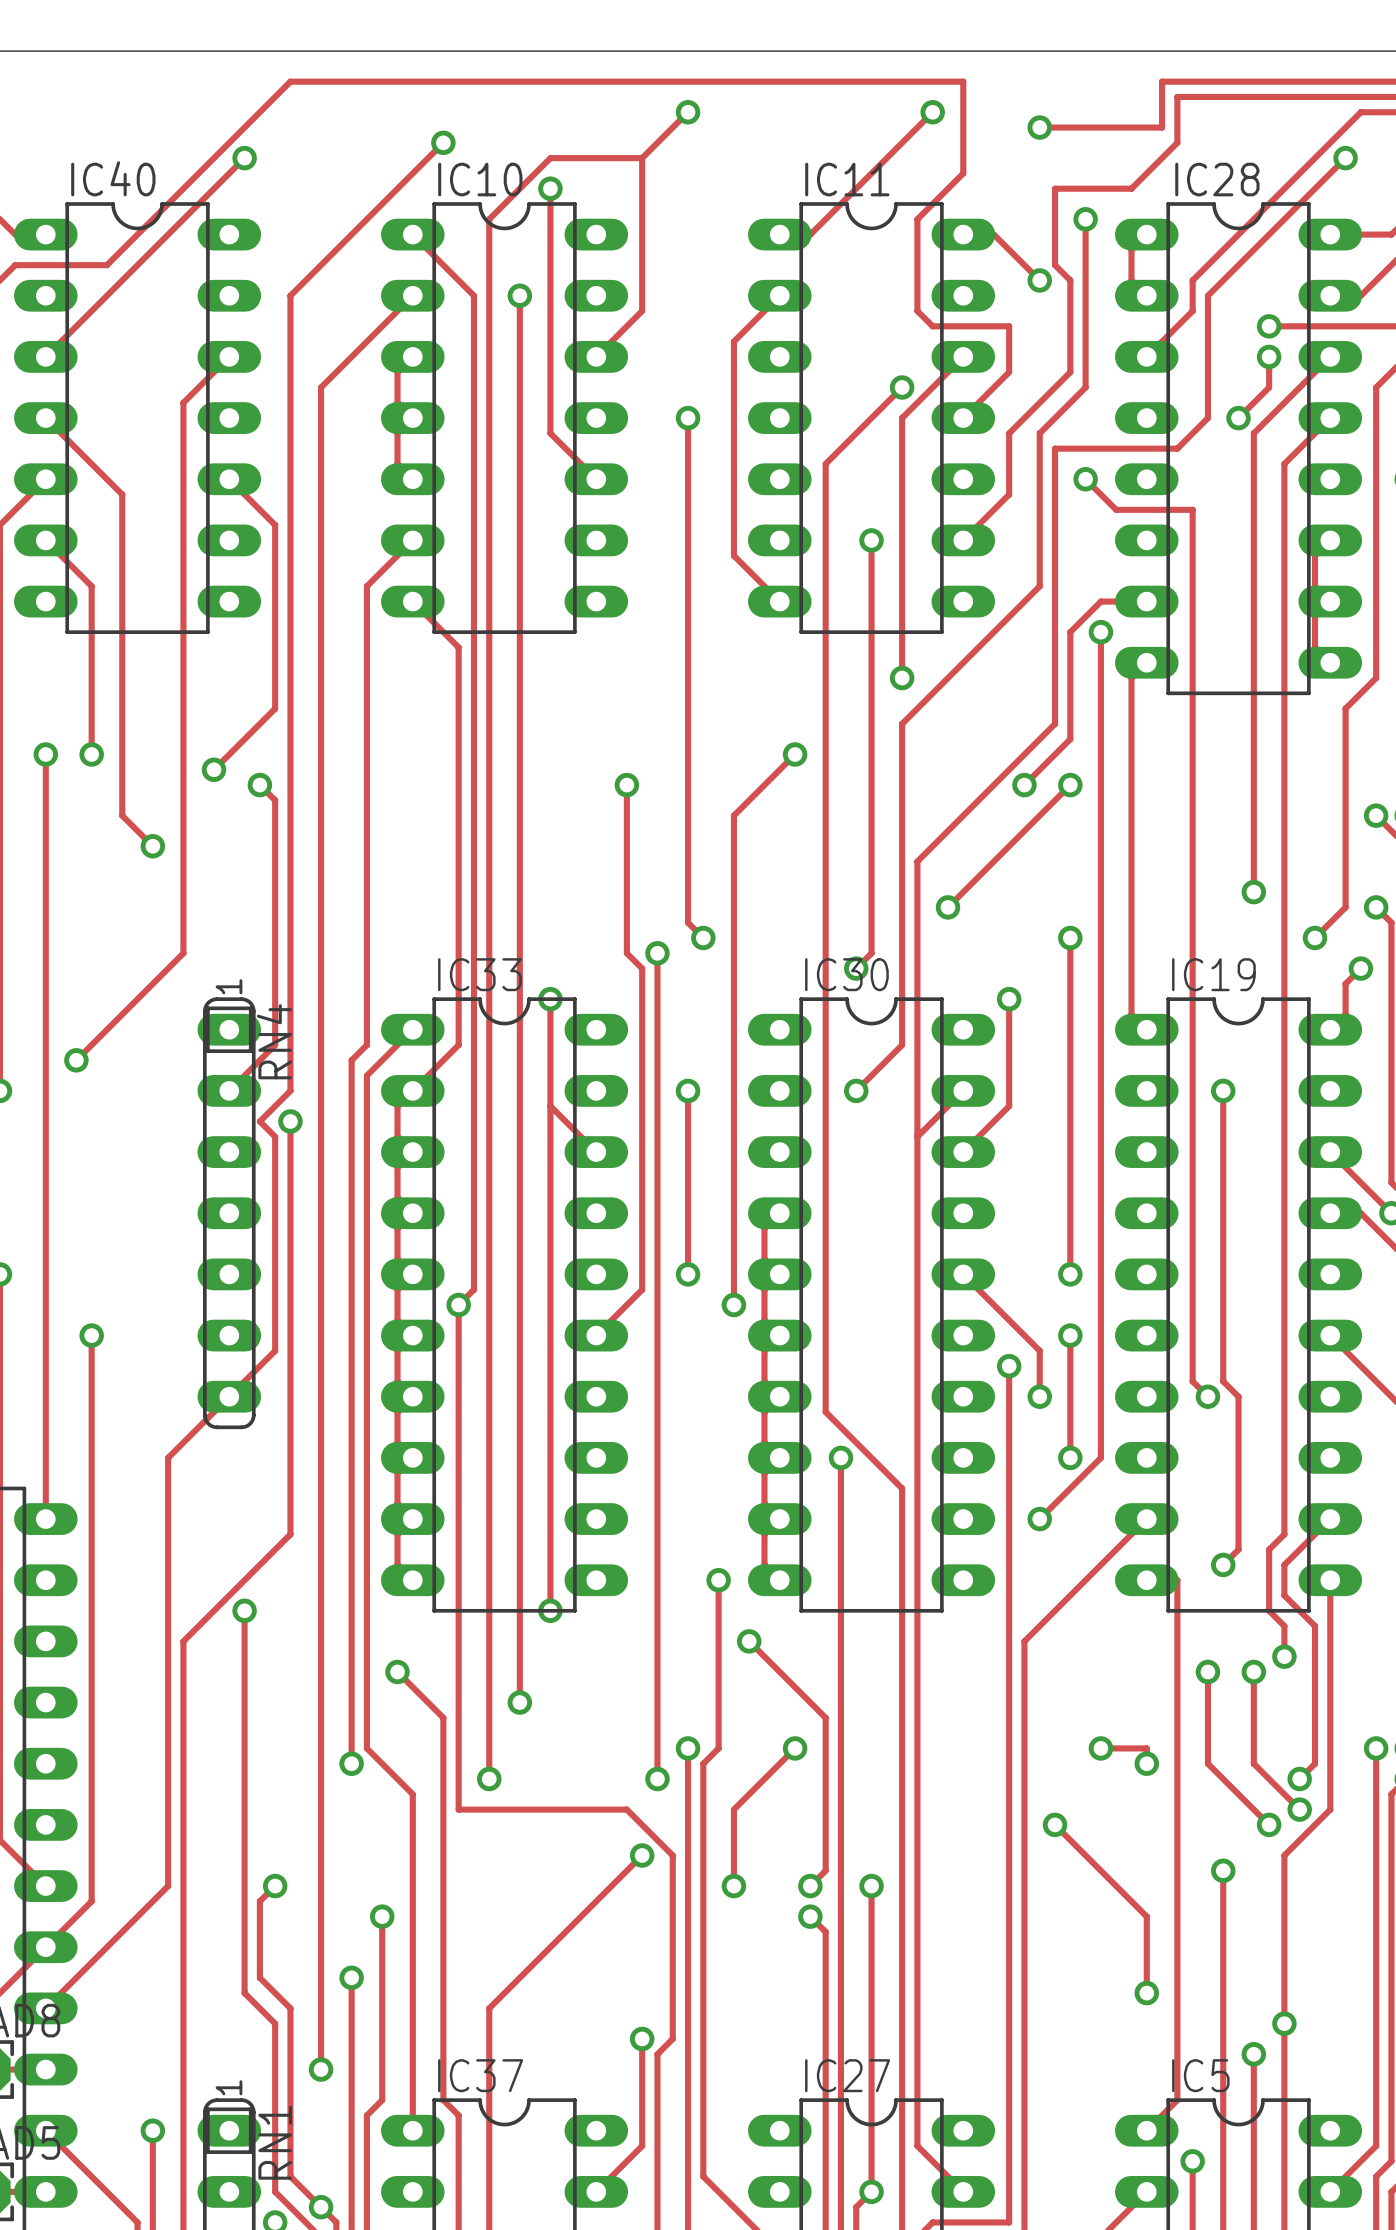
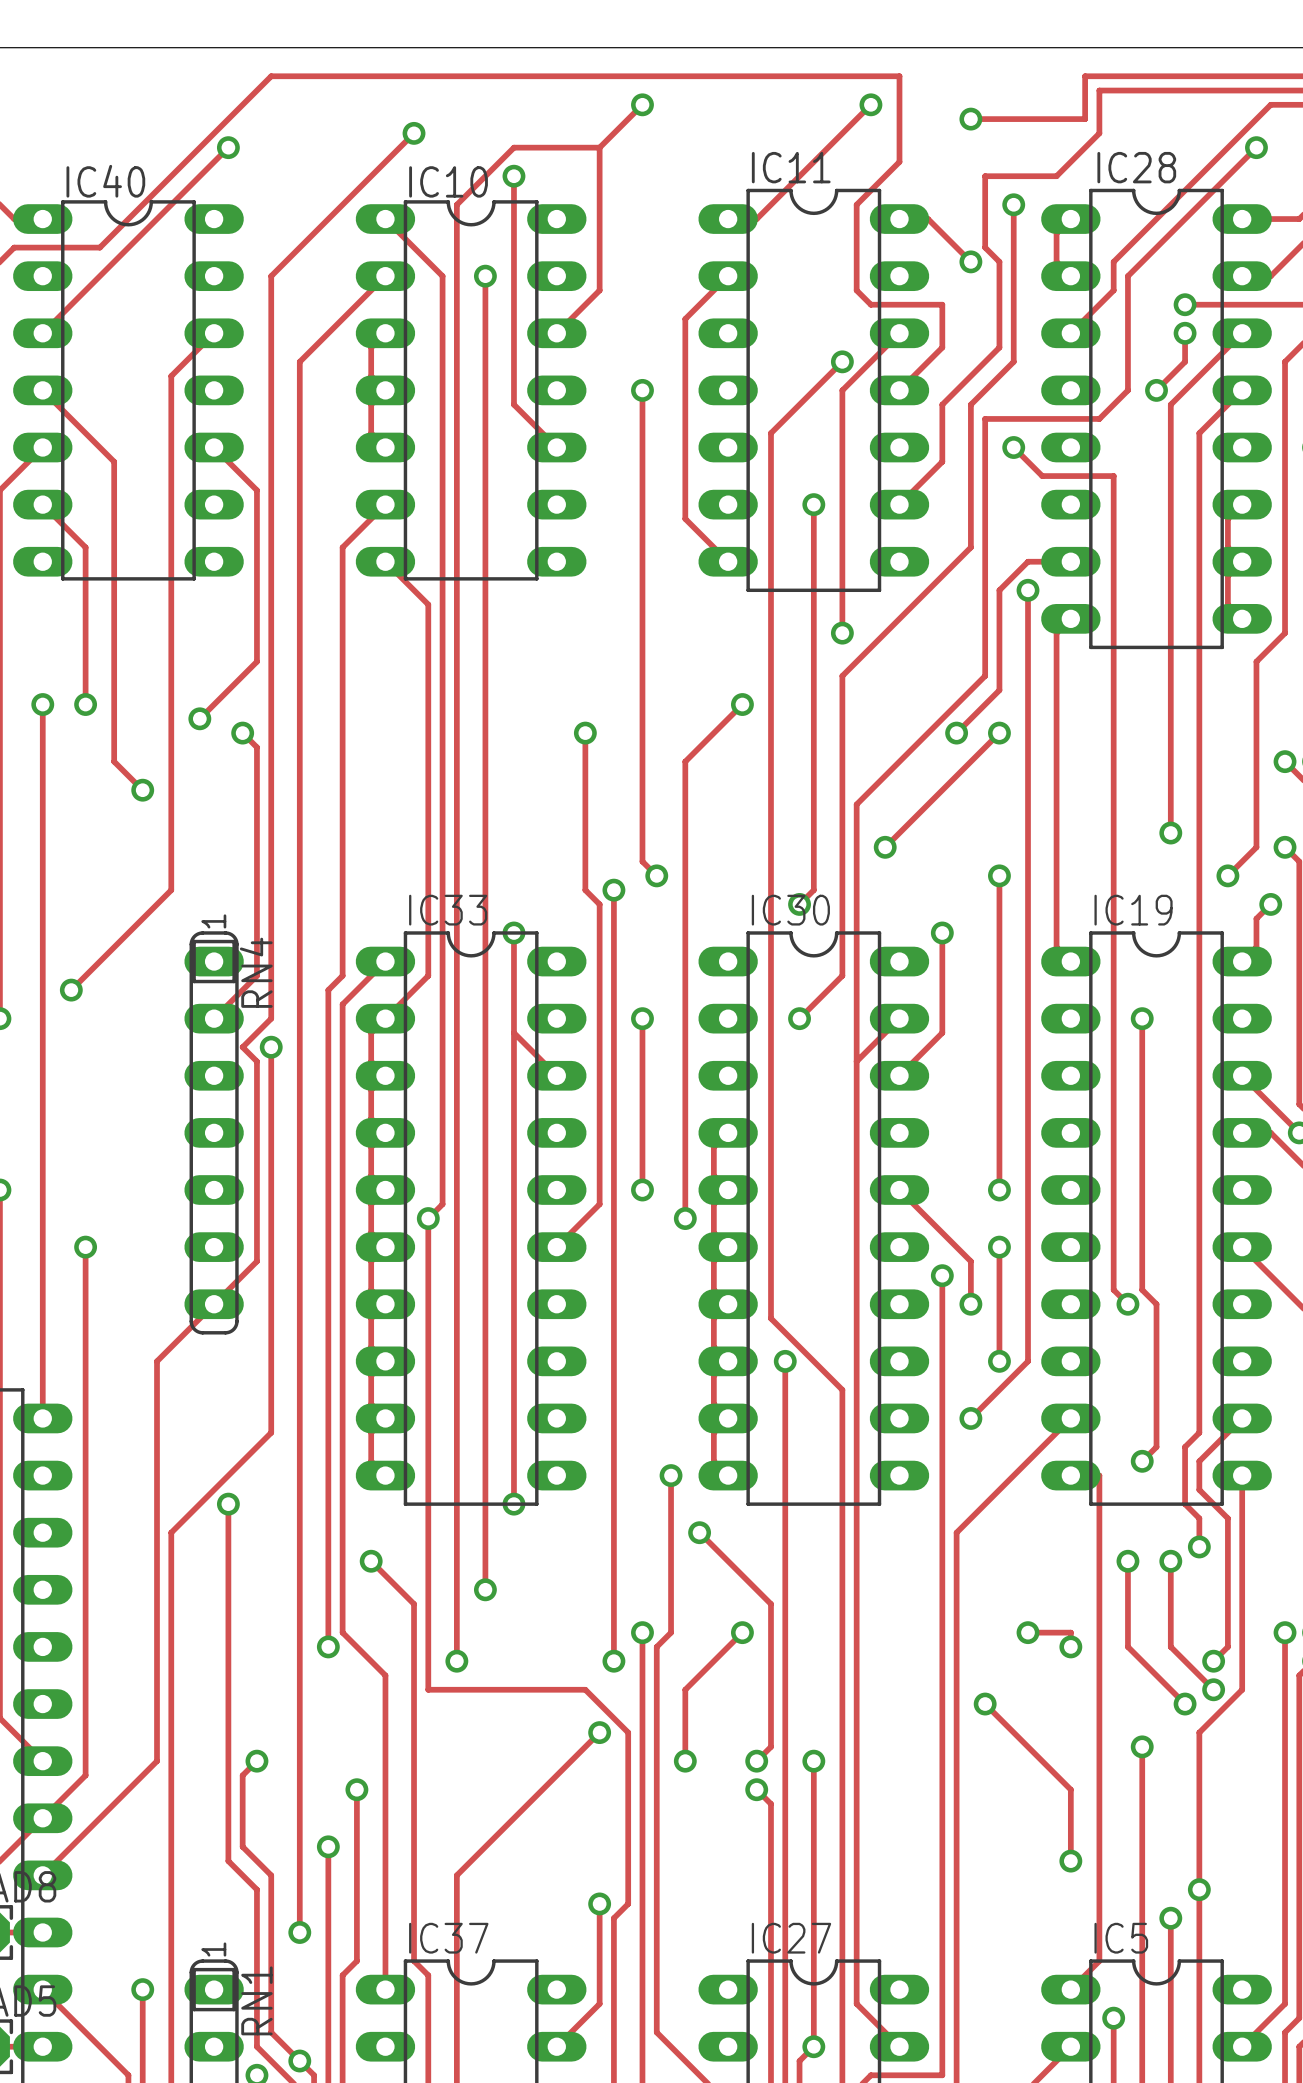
IC40 name position: IC40 (113, 178) -> IC40 (105, 181)
IC10 name position: IC10 (480, 179) -> IC10 (448, 181)
IC40 footprint: [14, 202, 262, 634] -> [13, 200, 244, 581]
IC10 footprint: [380, 202, 629, 634] -> [355, 200, 587, 581]

